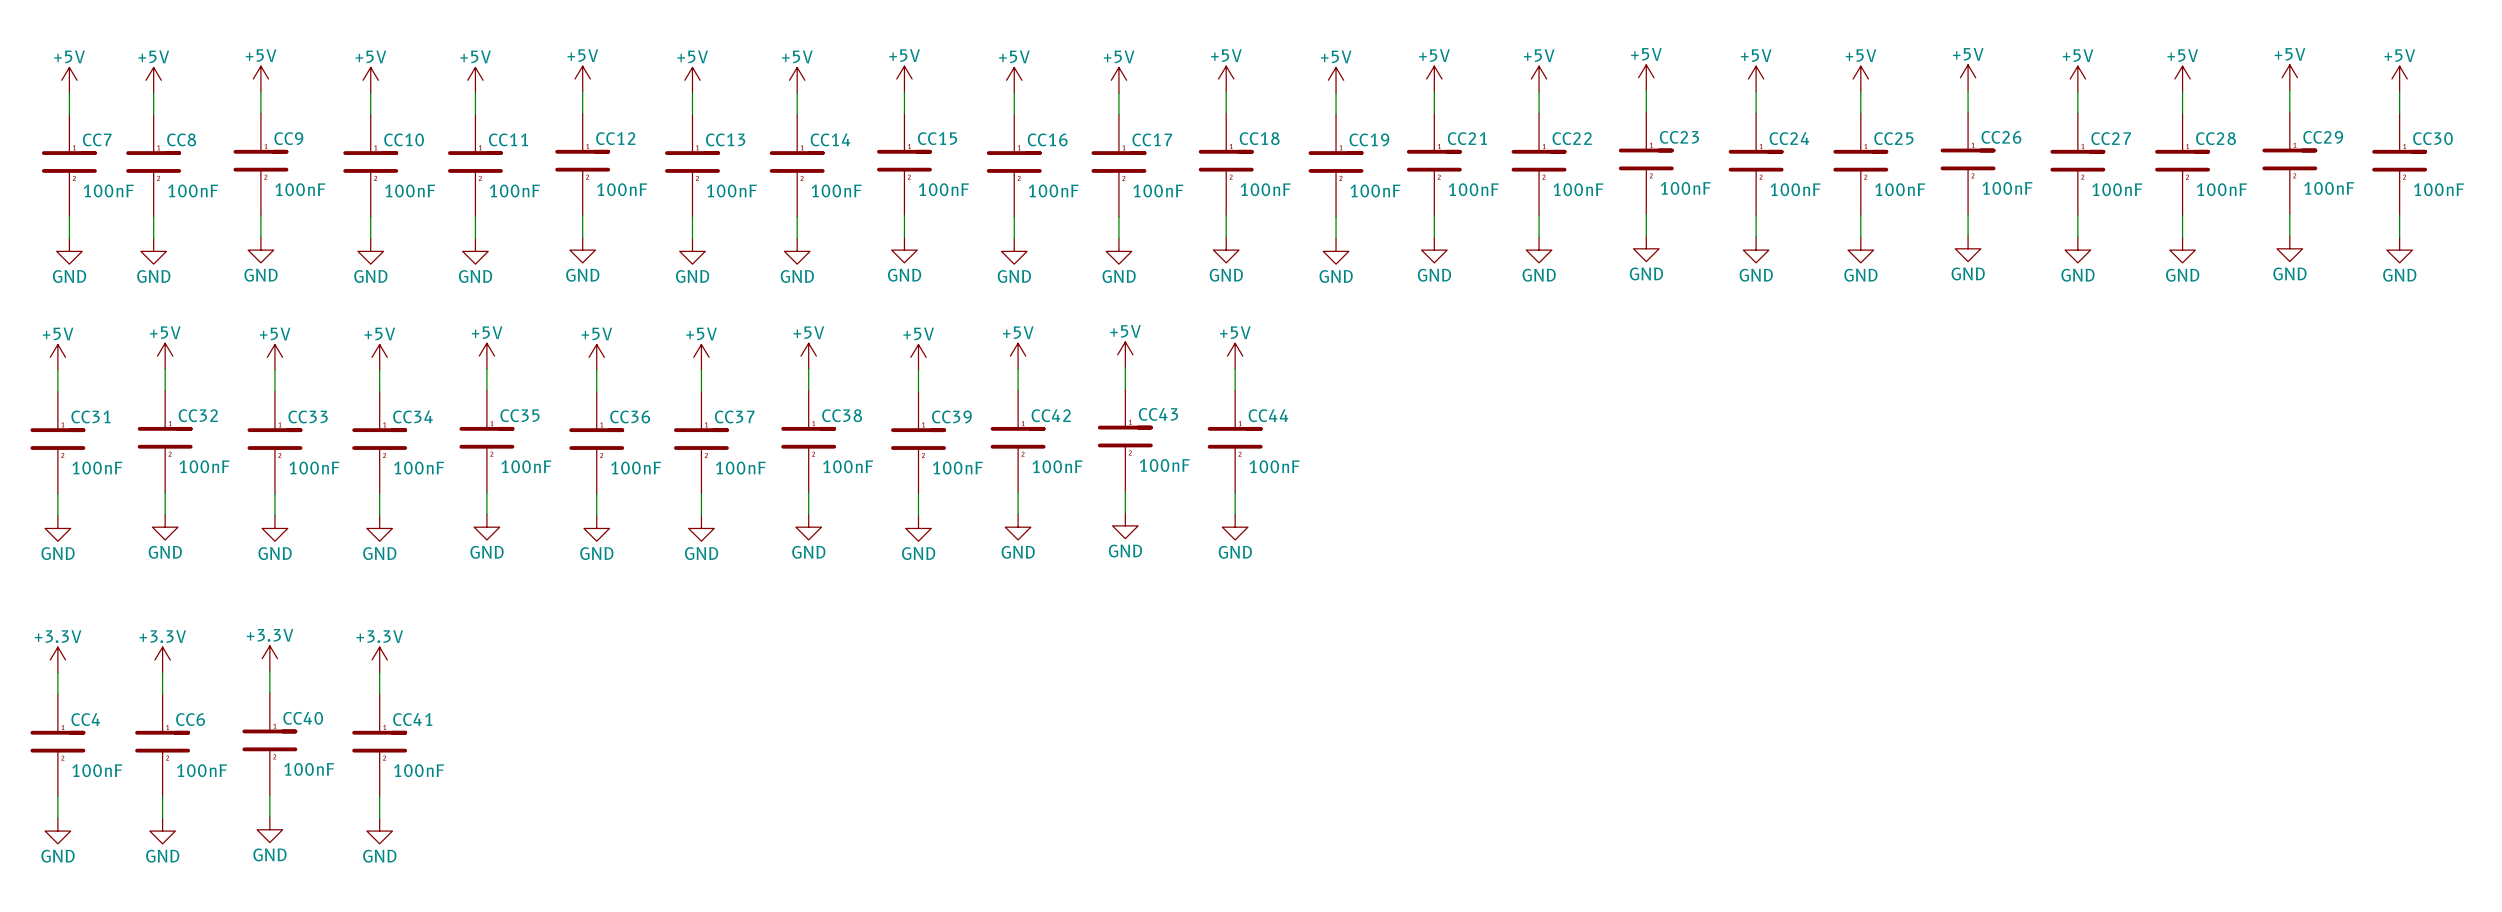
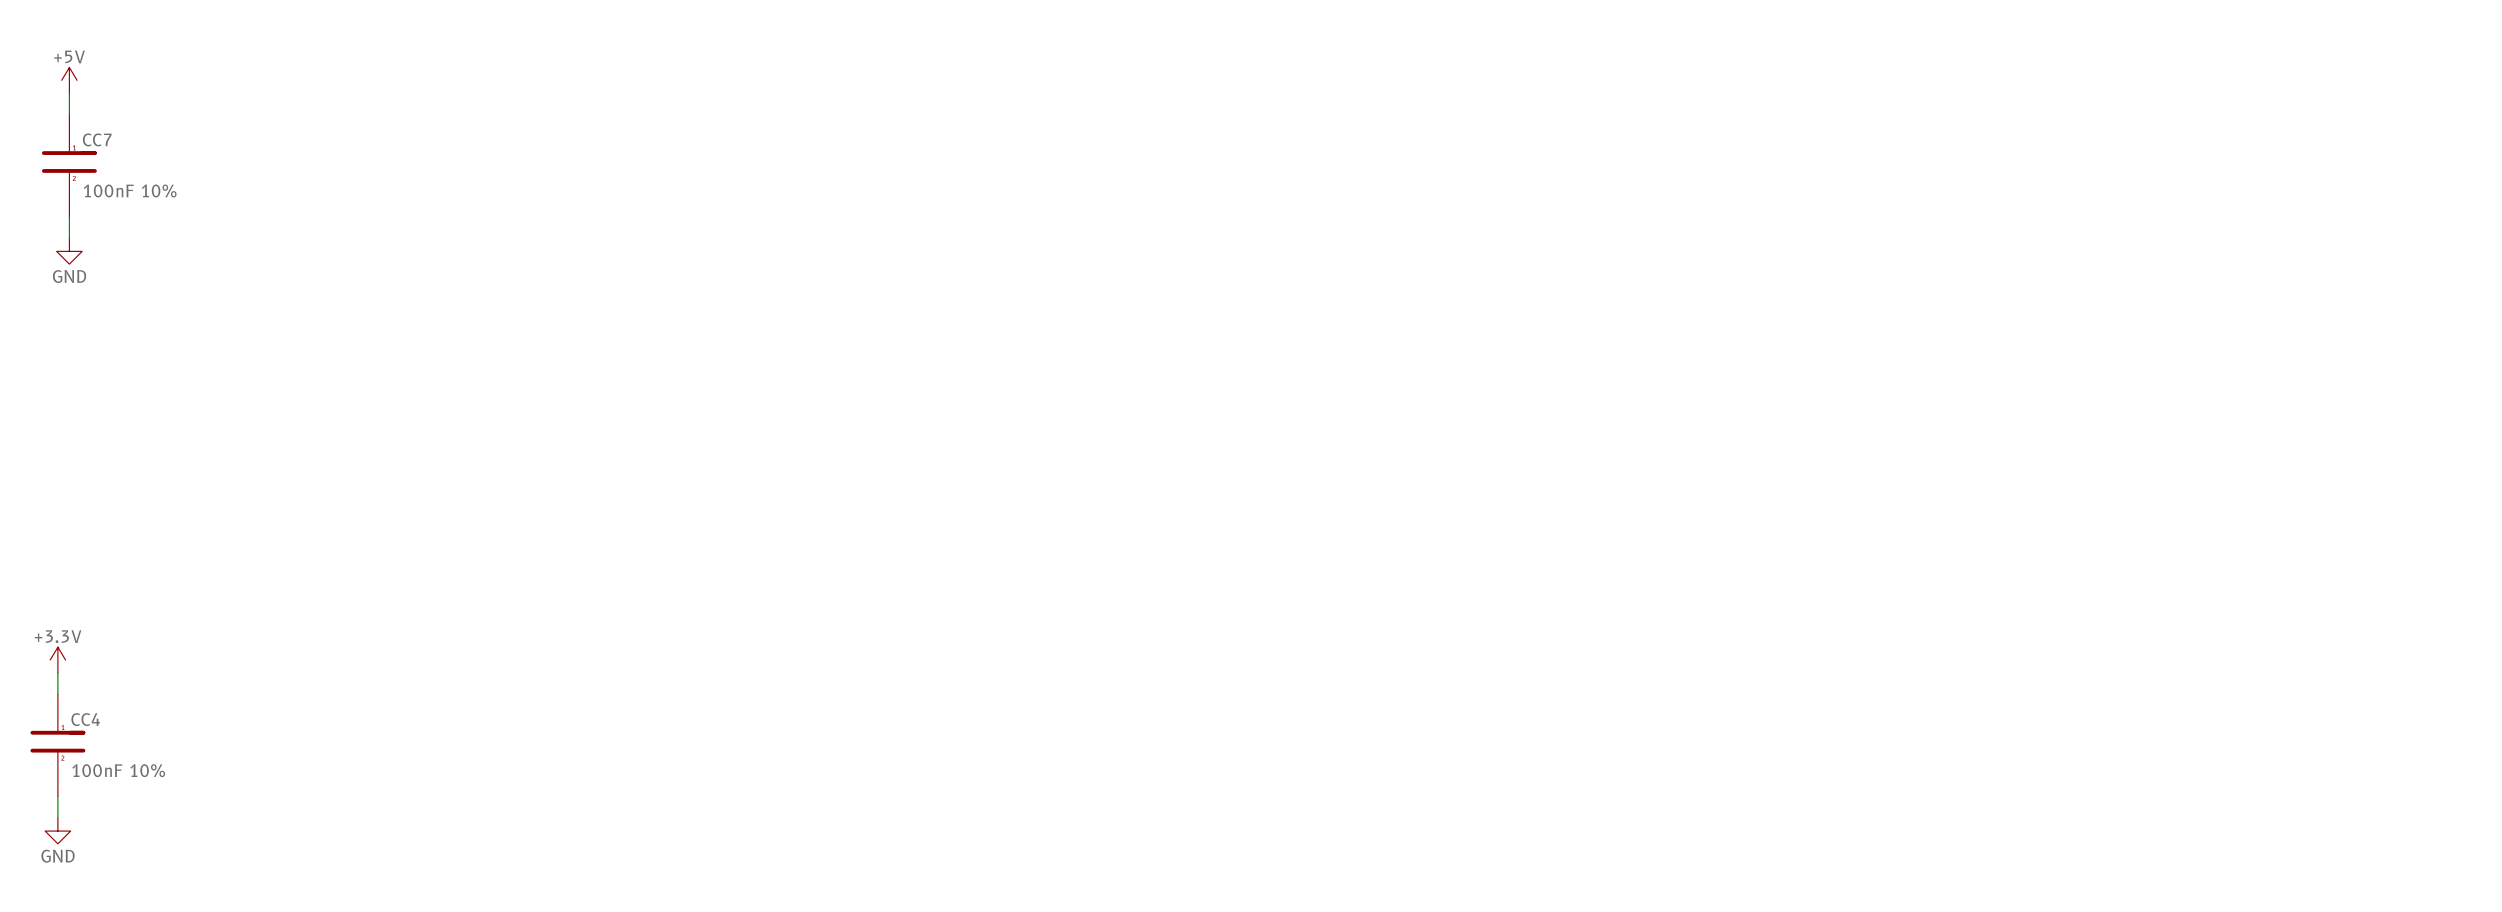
power symbol: +5V (1646, 77) -> none
power symbol: +5V (1968, 77) -> none
power symbol: +5V (2289, 77) -> none
power symbol: +5V (260, 79) -> none
power symbol: +5V (582, 79) -> none
power symbol: +5V (904, 79) -> none
power symbol: +5V (1226, 79) -> none
power symbol: +5V (1434, 79) -> none
power symbol: +5V (1539, 79) -> none
power symbol: +5V (1756, 79) -> none
power symbol: +5V (1860, 79) -> none
power symbol: +5V (2077, 79) -> none
power symbol: +5V (2182, 79) -> none
power symbol: +5V (2399, 79) -> none
power symbol: +5V (153, 80) -> none
power symbol: +5V (370, 80) -> none
power symbol: +5V (475, 80) -> none
power symbol: +5V (692, 80) -> none
power symbol: +5V (797, 80) -> none
power symbol: +5V (1014, 80) -> none
power symbol: +5V (1118, 80) -> none
power symbol: +5V (1336, 80) -> none
wire: (1646, 90) (1646, 112) -> none
wire: (1968, 90) (1968, 112) -> none
wire: (2289, 90) (2289, 112) -> none
wire: (260, 91) (260, 113) -> none
wire: (582, 91) (582, 113) -> none
wire: (904, 91) (904, 113) -> none
wire: (1226, 91) (1226, 113) -> none
wire: (1434, 91) (1434, 113) -> none
wire: (1539, 91) (1539, 113) -> none
wire: (1756, 91) (1756, 113) -> none
wire: (1860, 91) (1860, 113) -> none
wire: (2077, 91) (2077, 113) -> none
wire: (2182, 91) (2182, 113) -> none
wire: (2399, 91) (2399, 113) -> none
wire: (153, 93) (153, 114) -> none
wire: (370, 93) (370, 114) -> none
wire: (475, 93) (475, 114) -> none
wire: (692, 93) (692, 114) -> none
wire: (797, 93) (797, 114) -> none
wire: (1014, 93) (1014, 114) -> none
wire: (1118, 93) (1118, 114) -> none
wire: (1336, 93) (1336, 114) -> none
CC23: 100nF (1646, 163) -> none
CC26: 100nF (1968, 163) -> none
CC29: 100nF (2289, 163) -> none
CC9: 100nF (260, 164) -> none
CC12: 100nF (582, 164) -> none
CC15: 100nF (904, 164) -> none
CC18: 100nF (1226, 164) -> none
CC21: 100nF (1434, 164) -> none
CC22: 100nF (1539, 164) -> none
CC24: 100nF (1756, 164) -> none
CC25: 100nF (1860, 164) -> none
CC27: 100nF (2077, 164) -> none
CC28: 100nF (2182, 164) -> none
CC30: 100nF (2399, 164) -> none
CC8: 100nF (153, 165) -> none
CC10: 100nF (370, 165) -> none
CC11: 100nF (475, 165) -> none
CC13: 100nF (692, 165) -> none
CC14: 100nF (797, 165) -> none
CC16: 100nF (1014, 165) -> none
CC17: 100nF (1118, 165) -> none
CC19: 100nF (1336, 165) -> none
CC7 value: 100nF (108, 190) -> 100nF 10% (130, 190)
wire: (1646, 214) (1646, 236) -> none
wire: (1968, 214) (1968, 236) -> none
wire: (2289, 214) (2289, 236) -> none
wire: (260, 215) (260, 237) -> none
wire: (582, 215) (582, 237) -> none
wire: (904, 215) (904, 237) -> none
wire: (1226, 215) (1226, 237) -> none
wire: (1434, 215) (1434, 237) -> none
wire: (1539, 215) (1539, 237) -> none
wire: (1756, 215) (1756, 237) -> none
wire: (1860, 215) (1860, 237) -> none
wire: (2077, 215) (2077, 237) -> none
wire: (2182, 215) (2182, 237) -> none
wire: (2399, 215) (2399, 237) -> none
wire: (153, 216) (153, 238) -> none
wire: (370, 216) (370, 238) -> none
wire: (475, 216) (475, 238) -> none
wire: (692, 216) (692, 238) -> none
wire: (797, 216) (797, 238) -> none
wire: (1014, 216) (1014, 238) -> none
wire: (1118, 216) (1118, 238) -> none
wire: (1336, 216) (1336, 238) -> none
power symbol: GND (1646, 248) -> none
power symbol: GND (1968, 248) -> none
power symbol: GND (2289, 248) -> none
power symbol: GND (260, 250) -> none
power symbol: GND (582, 250) -> none
power symbol: GND (904, 250) -> none
power symbol: GND (1226, 250) -> none
power symbol: GND (1434, 250) -> none
power symbol: GND (1539, 250) -> none
power symbol: GND (1756, 250) -> none
power symbol: GND (1860, 250) -> none
power symbol: GND (2077, 250) -> none
power symbol: GND (2182, 250) -> none
power symbol: GND (2399, 250) -> none
power symbol: GND (153, 251) -> none
power symbol: GND (370, 251) -> none
power symbol: GND (475, 251) -> none
power symbol: GND (692, 251) -> none
power symbol: GND (797, 251) -> none
power symbol: GND (1014, 251) -> none
power symbol: GND (1118, 251) -> none
power symbol: GND (1336, 251) -> none
power symbol: +5V (1125, 354) -> none
power symbol: +5V (165, 356) -> none
power symbol: +5V (486, 356) -> none
power symbol: +5V (808, 356) -> none
power symbol: +5V (1018, 356) -> none
power symbol: +5V (1235, 356) -> none
power symbol: +5V (57, 357) -> none
power symbol: +5V (274, 357) -> none
power symbol: +5V (379, 357) -> none
power symbol: +5V (596, 357) -> none
power symbol: +5V (701, 357) -> none
power symbol: +5V (918, 357) -> none
wire: (1125, 367) (1125, 389) -> none
wire: (165, 368) (165, 390) -> none
wire: (486, 368) (486, 390) -> none
wire: (808, 368) (808, 390) -> none
wire: (1018, 368) (1018, 390) -> none
wire: (1235, 368) (1235, 390) -> none
wire: (57, 370) (57, 391) -> none
wire: (274, 370) (274, 391) -> none
wire: (379, 370) (379, 391) -> none
wire: (596, 370) (596, 391) -> none
wire: (701, 370) (701, 391) -> none
wire: (918, 370) (918, 391) -> none
CC43: 100nF (1125, 440) -> none
CC32: 100nF (165, 441) -> none
CC35: 100nF (486, 441) -> none
CC38: 100nF (808, 441) -> none
CC42: 100nF (1018, 441) -> none
CC44: 100nF (1235, 441) -> none
CC31: 100nF (57, 442) -> none
CC33: 100nF (274, 442) -> none
CC34: 100nF (379, 442) -> none
CC36: 100nF (596, 442) -> none
CC37: 100nF (701, 442) -> none
CC39: 100nF (918, 442) -> none
wire: (1125, 491) (1125, 513) -> none
wire: (165, 492) (165, 514) -> none
wire: (486, 492) (486, 514) -> none
wire: (808, 492) (808, 514) -> none
wire: (1018, 492) (1018, 514) -> none
wire: (1235, 492) (1235, 514) -> none
wire: (57, 493) (57, 515) -> none
wire: (274, 493) (274, 515) -> none
wire: (379, 493) (379, 515) -> none
wire: (596, 493) (596, 515) -> none
wire: (701, 493) (701, 515) -> none
wire: (918, 493) (918, 515) -> none
power symbol: GND (1125, 525) -> none
power symbol: GND (165, 527) -> none
power symbol: GND (486, 527) -> none
power symbol: GND (808, 527) -> none
power symbol: GND (1018, 527) -> none
power symbol: GND (1235, 527) -> none
power symbol: GND (57, 528) -> none
power symbol: GND (274, 528) -> none
power symbol: GND (379, 528) -> none
power symbol: GND (596, 528) -> none
power symbol: GND (701, 528) -> none
power symbol: GND (918, 528) -> none
power symbol: +3.3V (269, 658) -> none
power symbol: +3.3V (162, 659) -> none
power symbol: +3.3V (379, 659) -> none
wire: (269, 671) (269, 693) -> none
wire: (162, 672) (162, 694) -> none
wire: (379, 672) (379, 694) -> none
CC40: 100nF (269, 744) -> none
CC6: 100nF (162, 745) -> none
CC41: 100nF (379, 745) -> none
CC4 value: 100nF (97, 770) -> 100nF 10% (118, 770)
wire: (269, 795) (269, 817) -> none
wire: (162, 796) (162, 818) -> none
wire: (379, 796) (379, 818) -> none
power symbol: GND (269, 829) -> none
power symbol: GND (162, 831) -> none
power symbol: GND (379, 831) -> none

